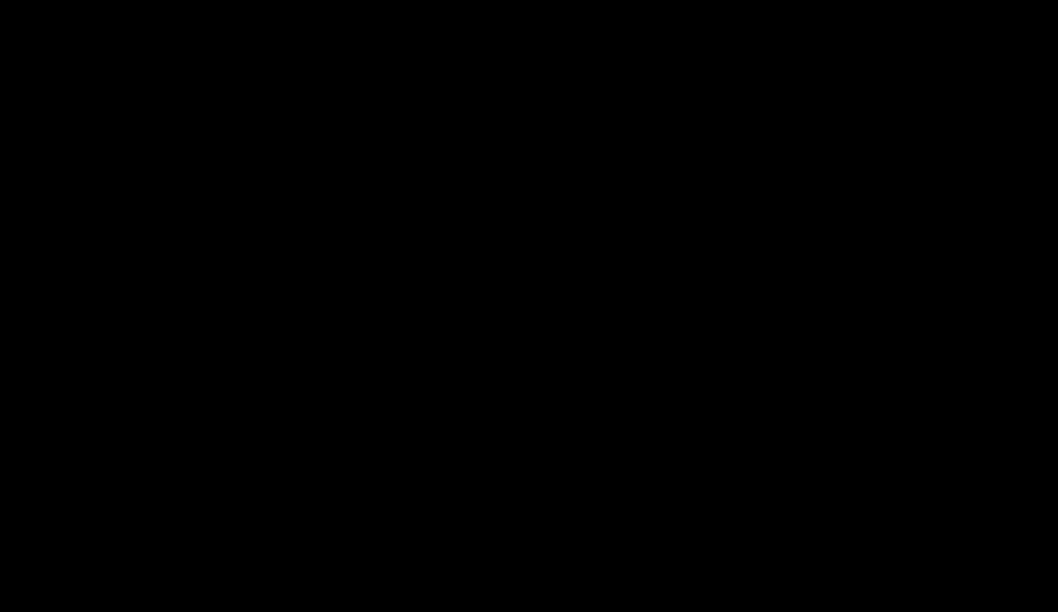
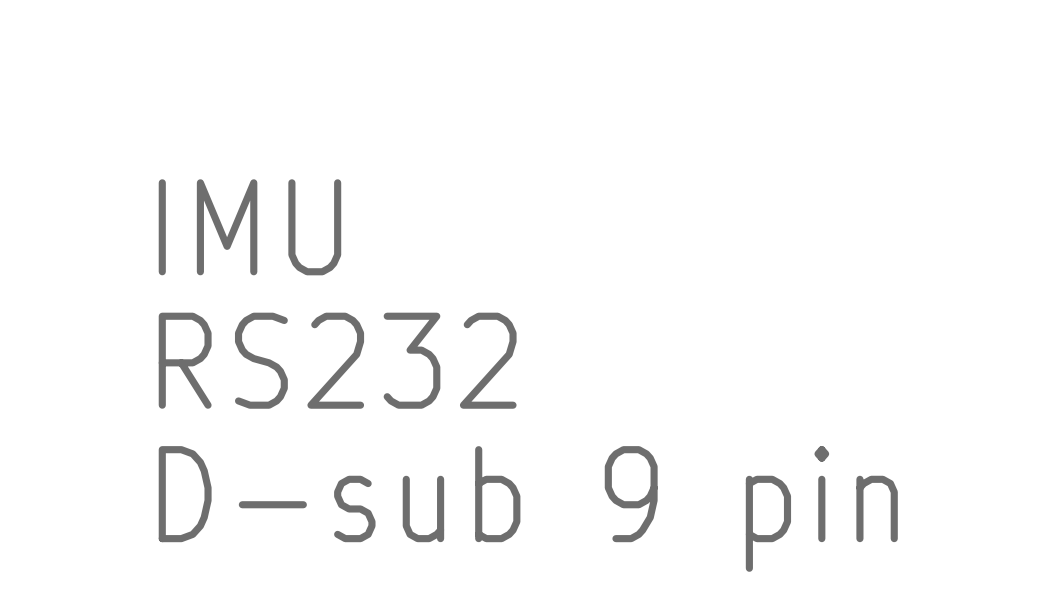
text: none -> IMU (249, 227)
text: none -> RS232 (337, 360)
text: none -> D-sub 9 pin (528, 508)

